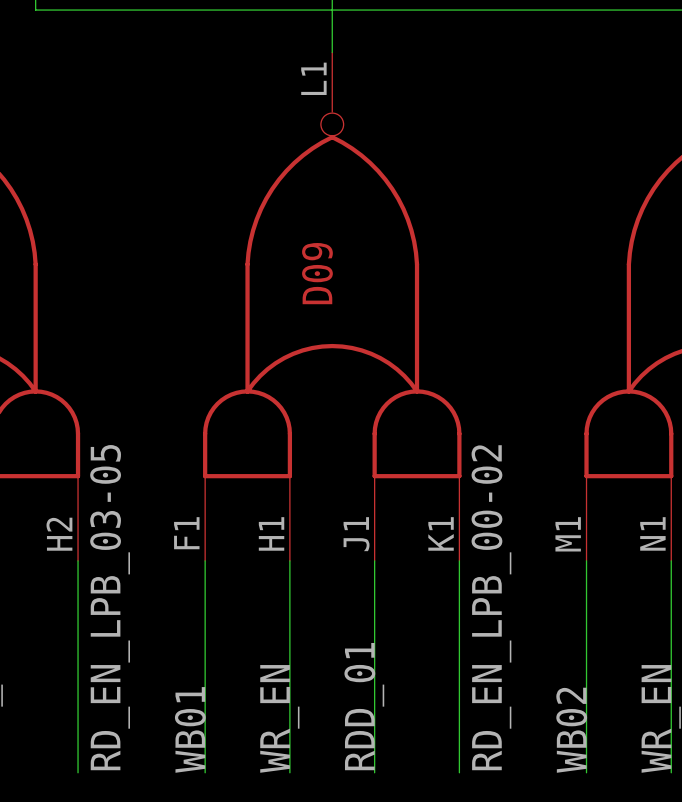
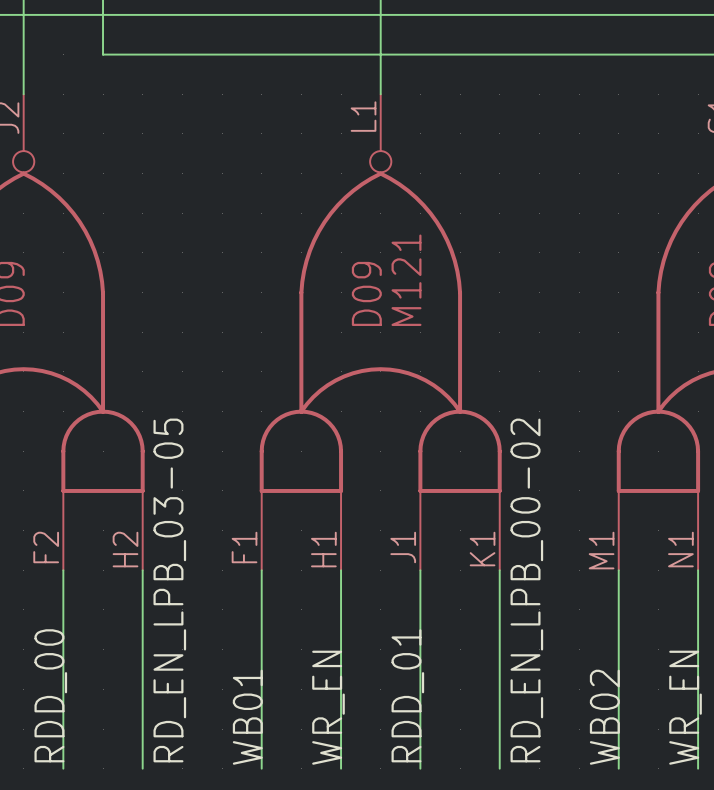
D09 value: none -> M121 (406, 280)

